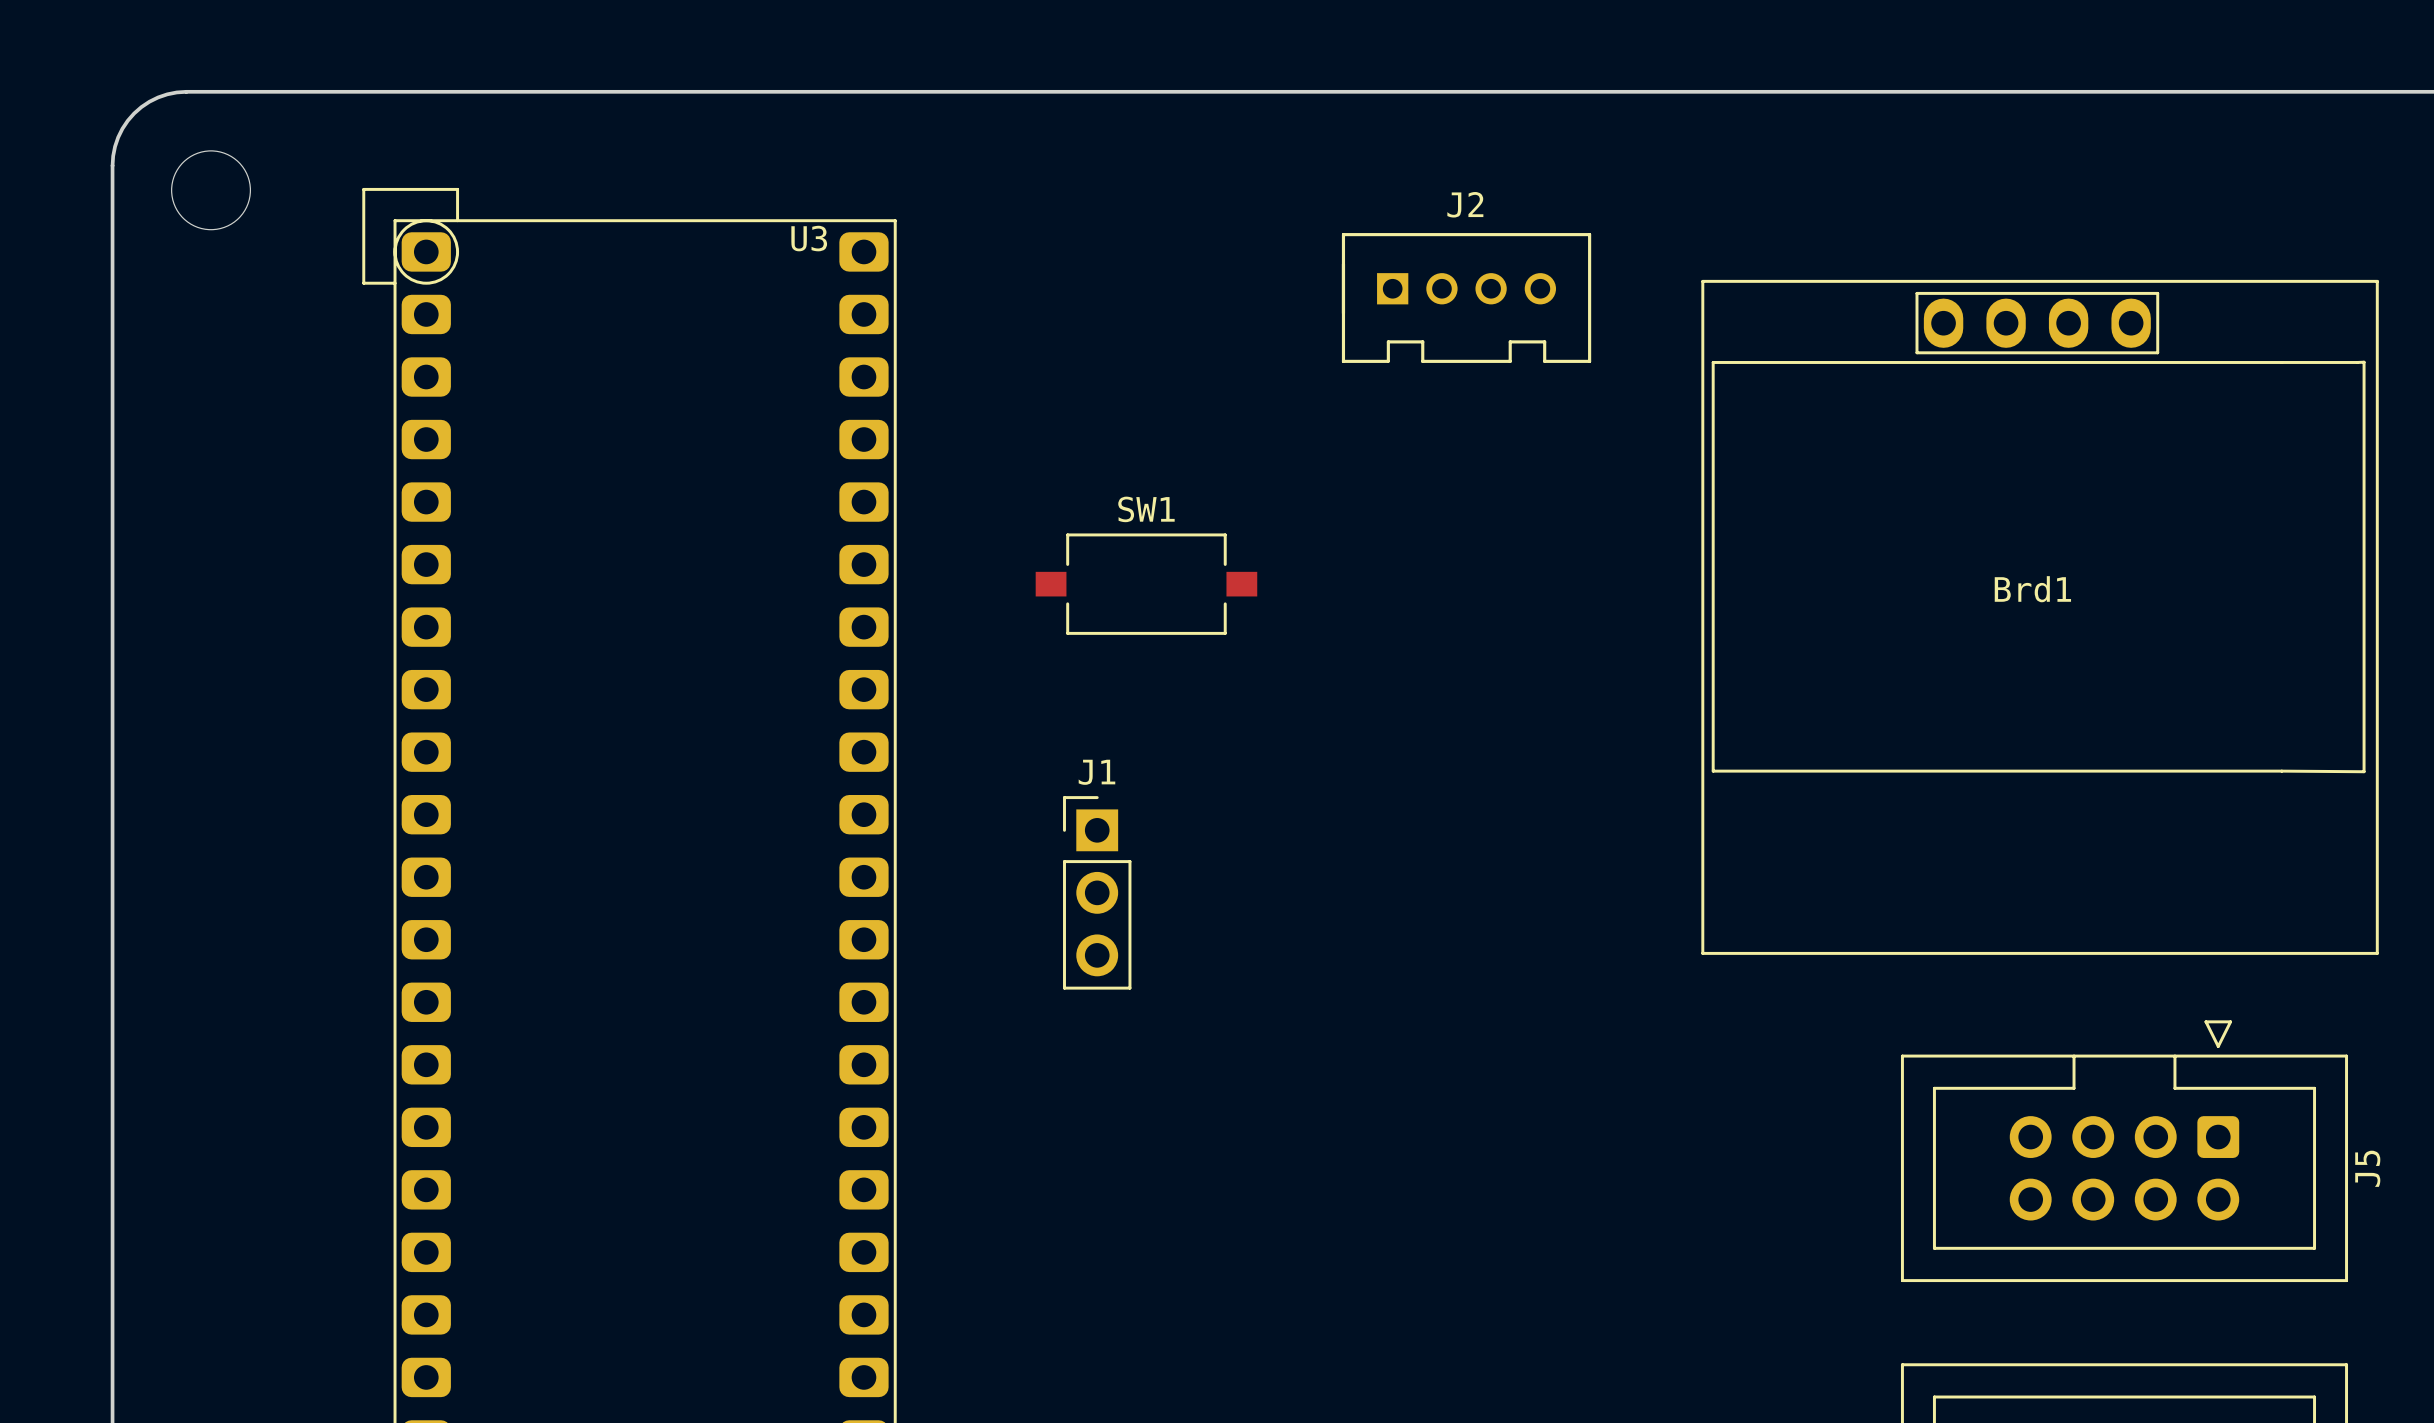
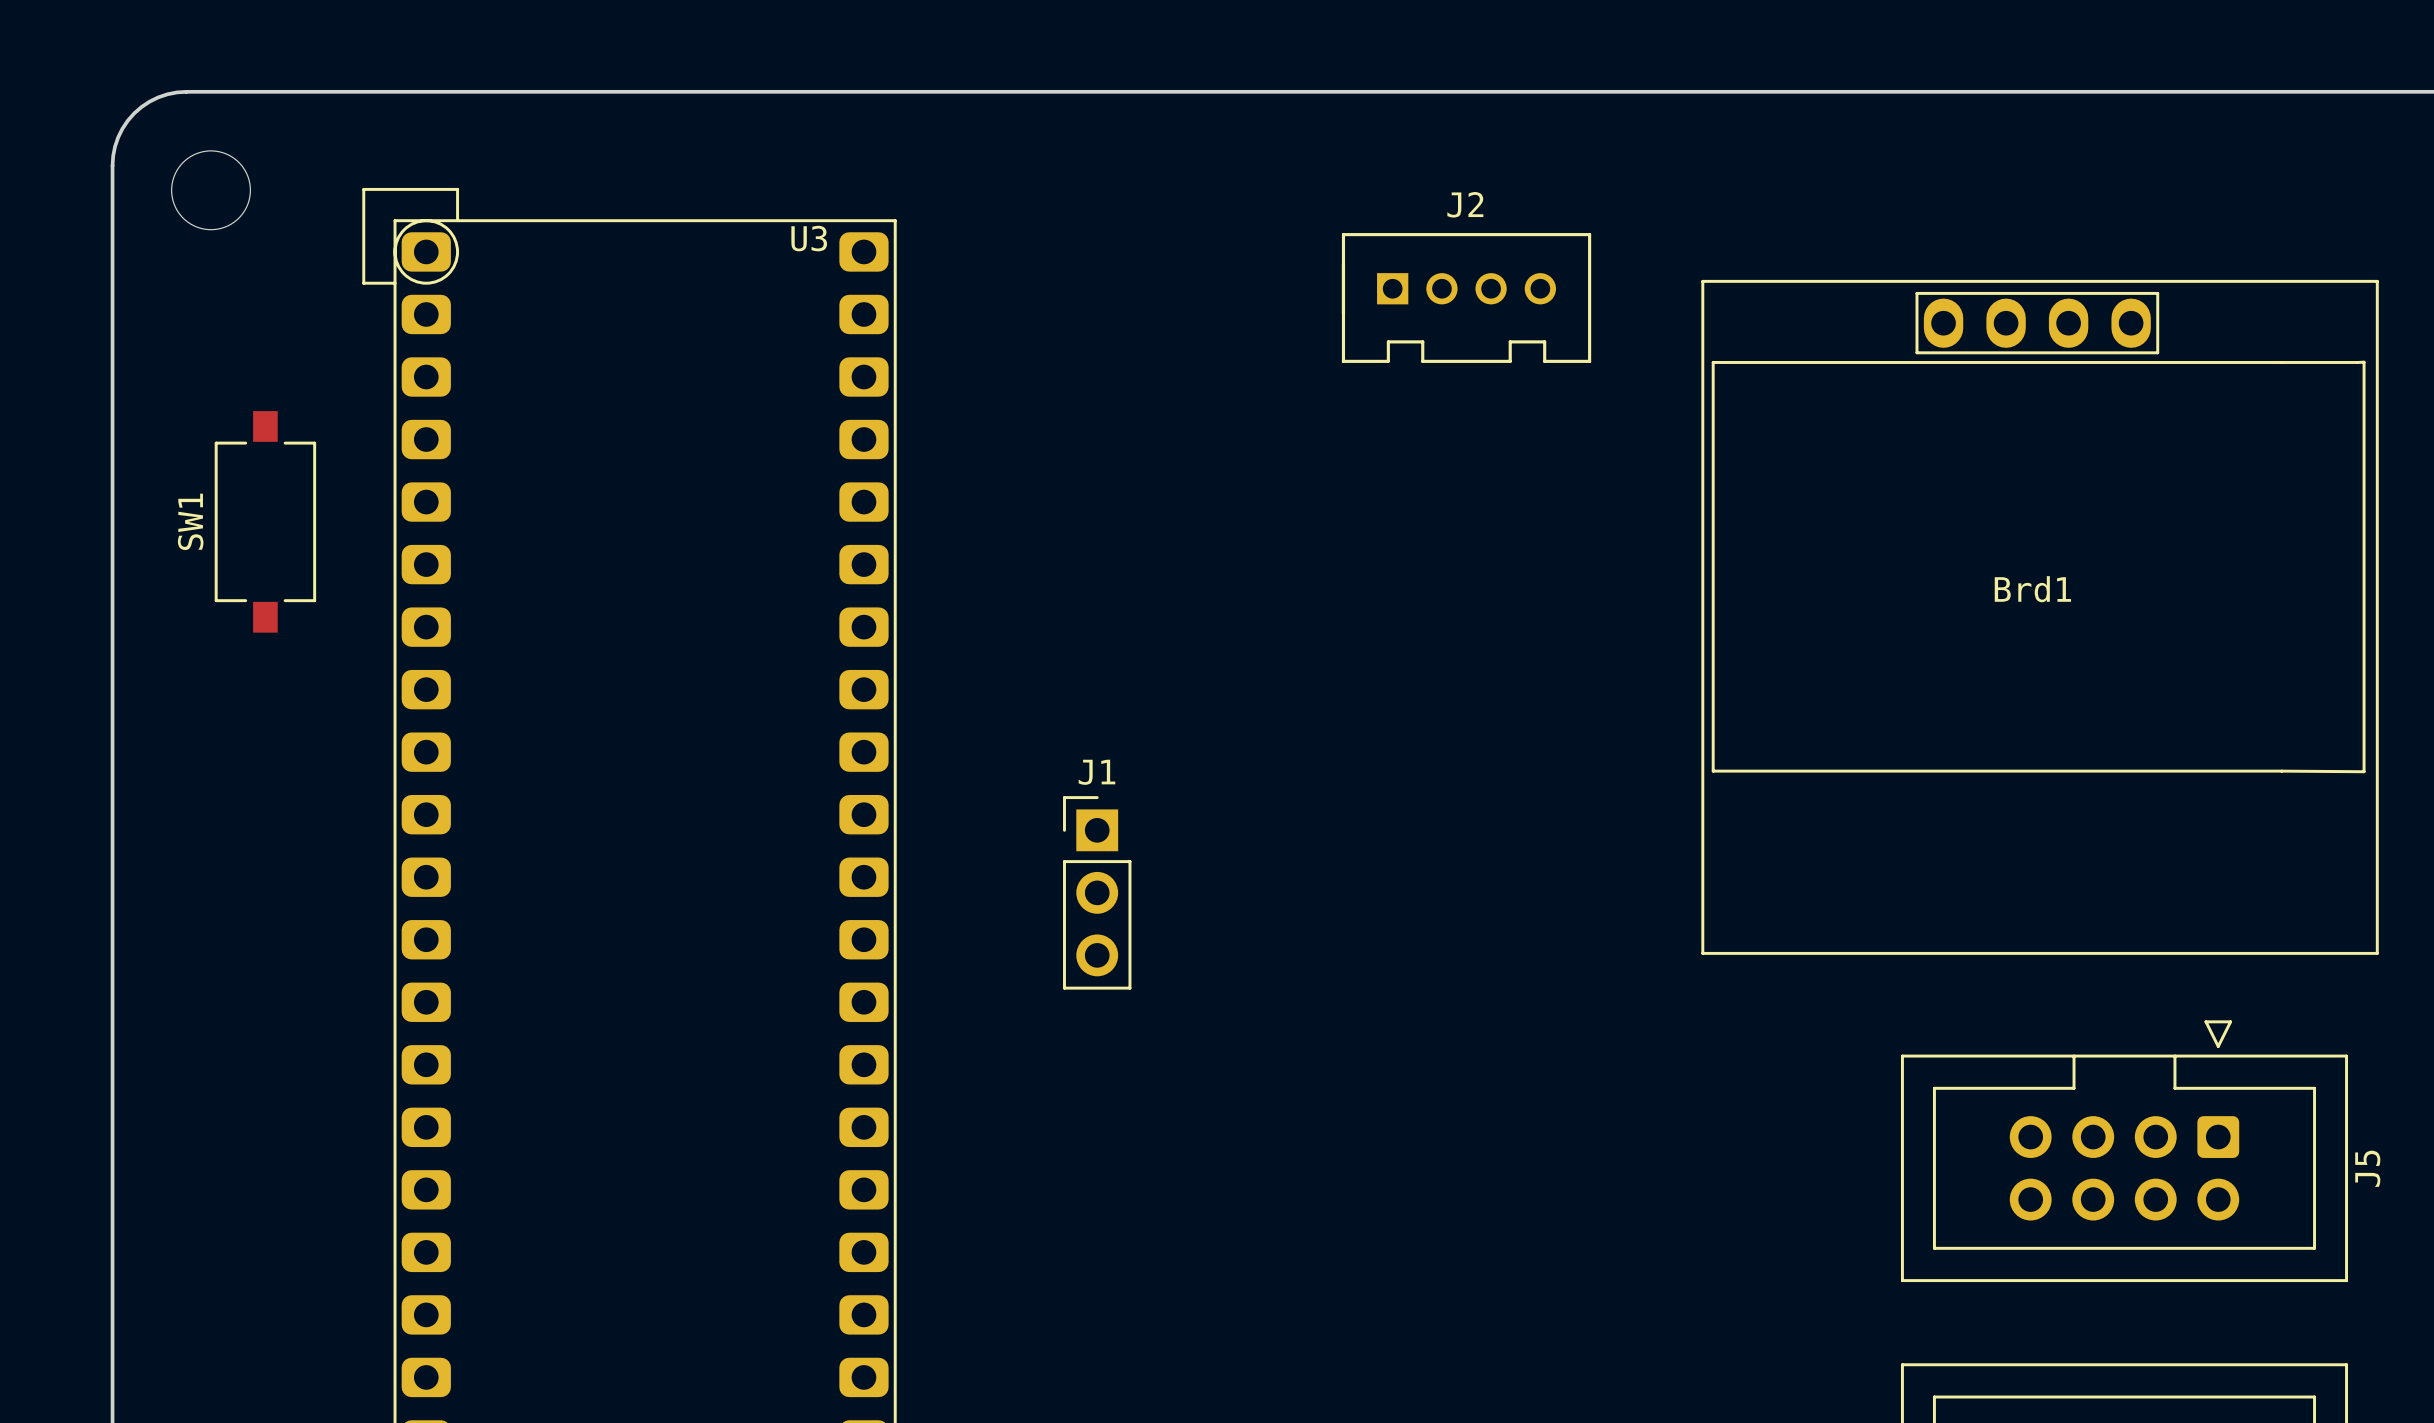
SW1 name position: SW1 (1146, 509) -> SW1 (190, 521)
SW1 rotation: 0° (1146, 584) -> 90° clockwise (265, 521)
SW1 position: (1146, 584) -> (265, 521)

